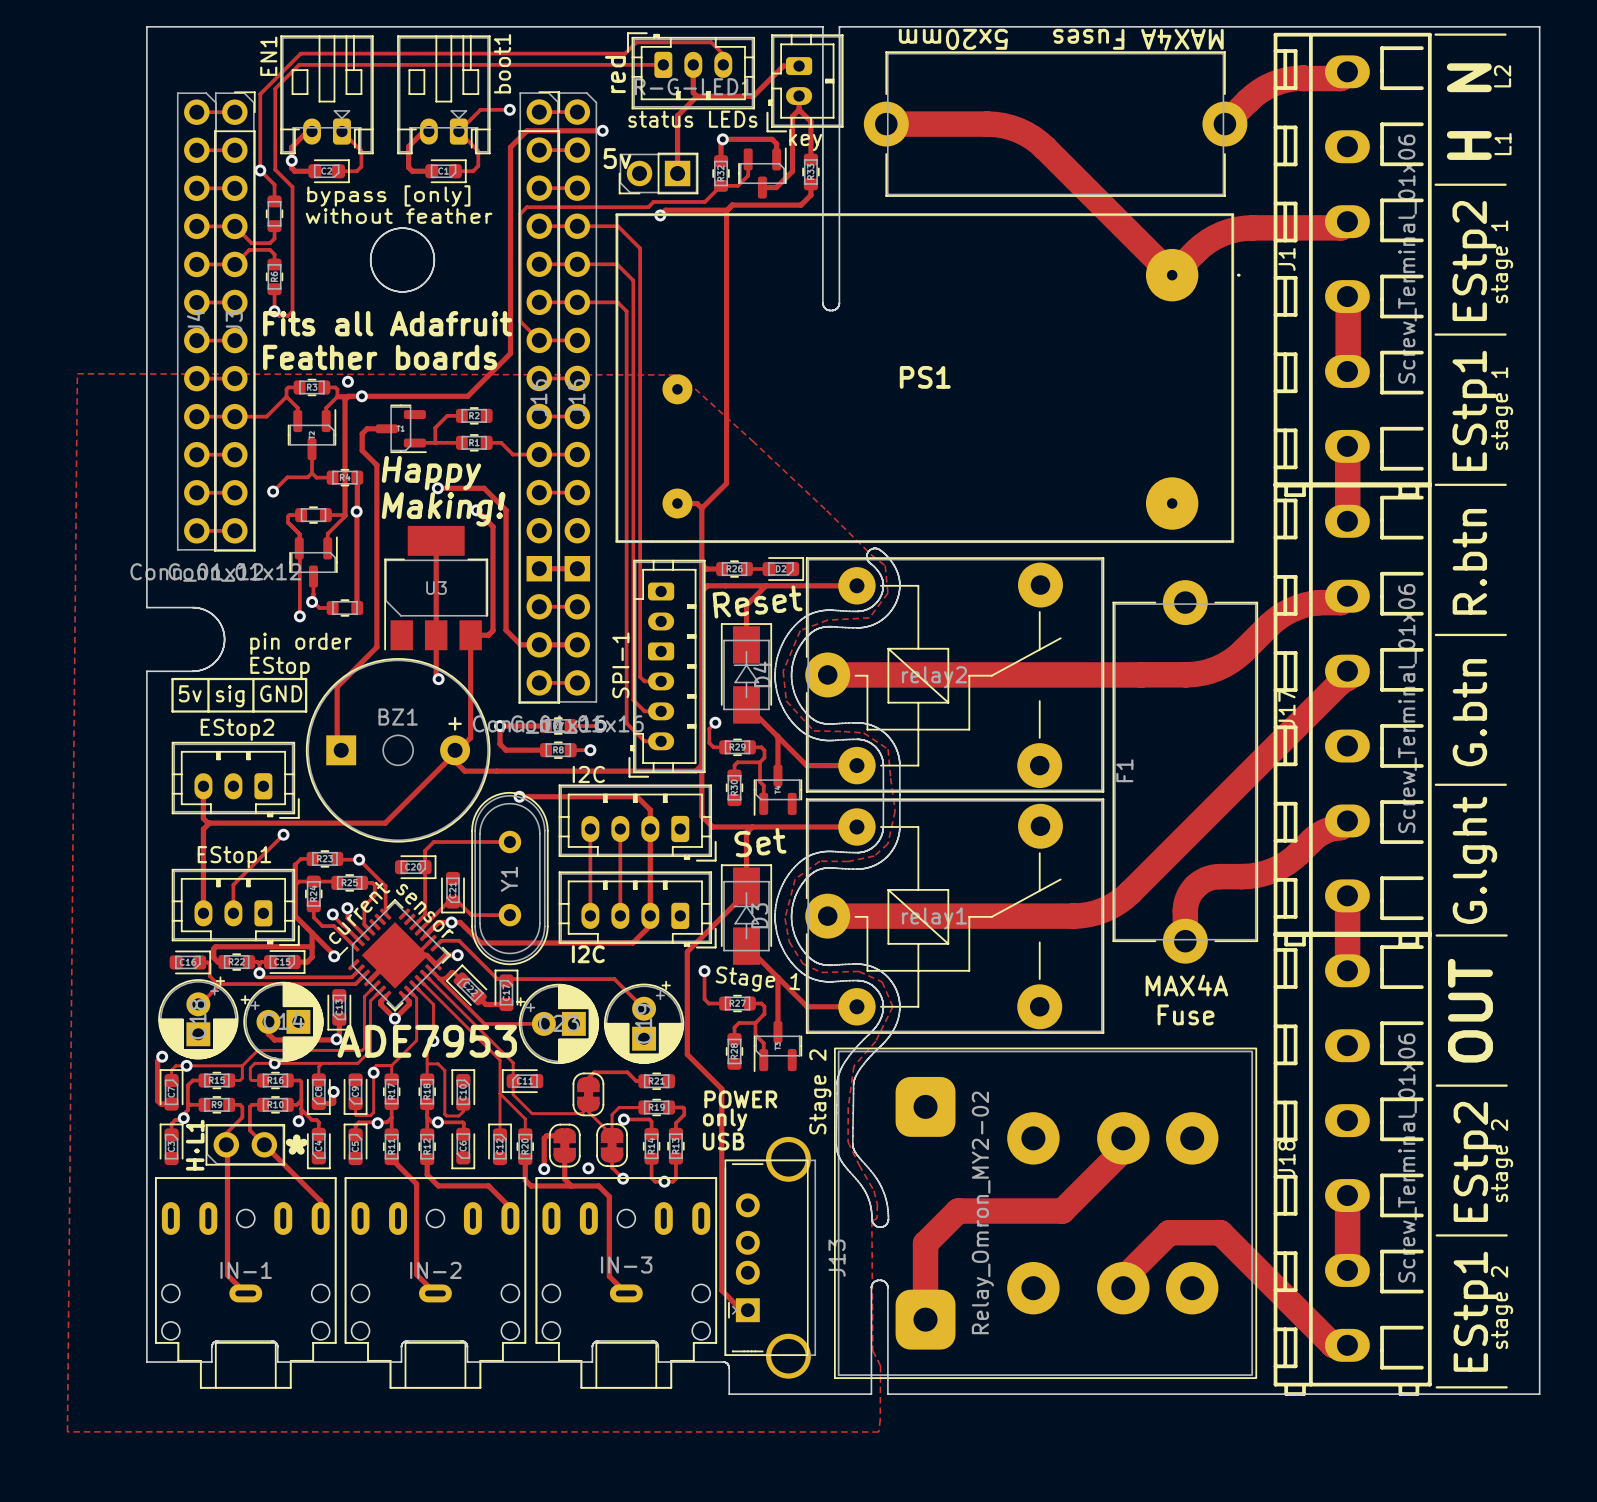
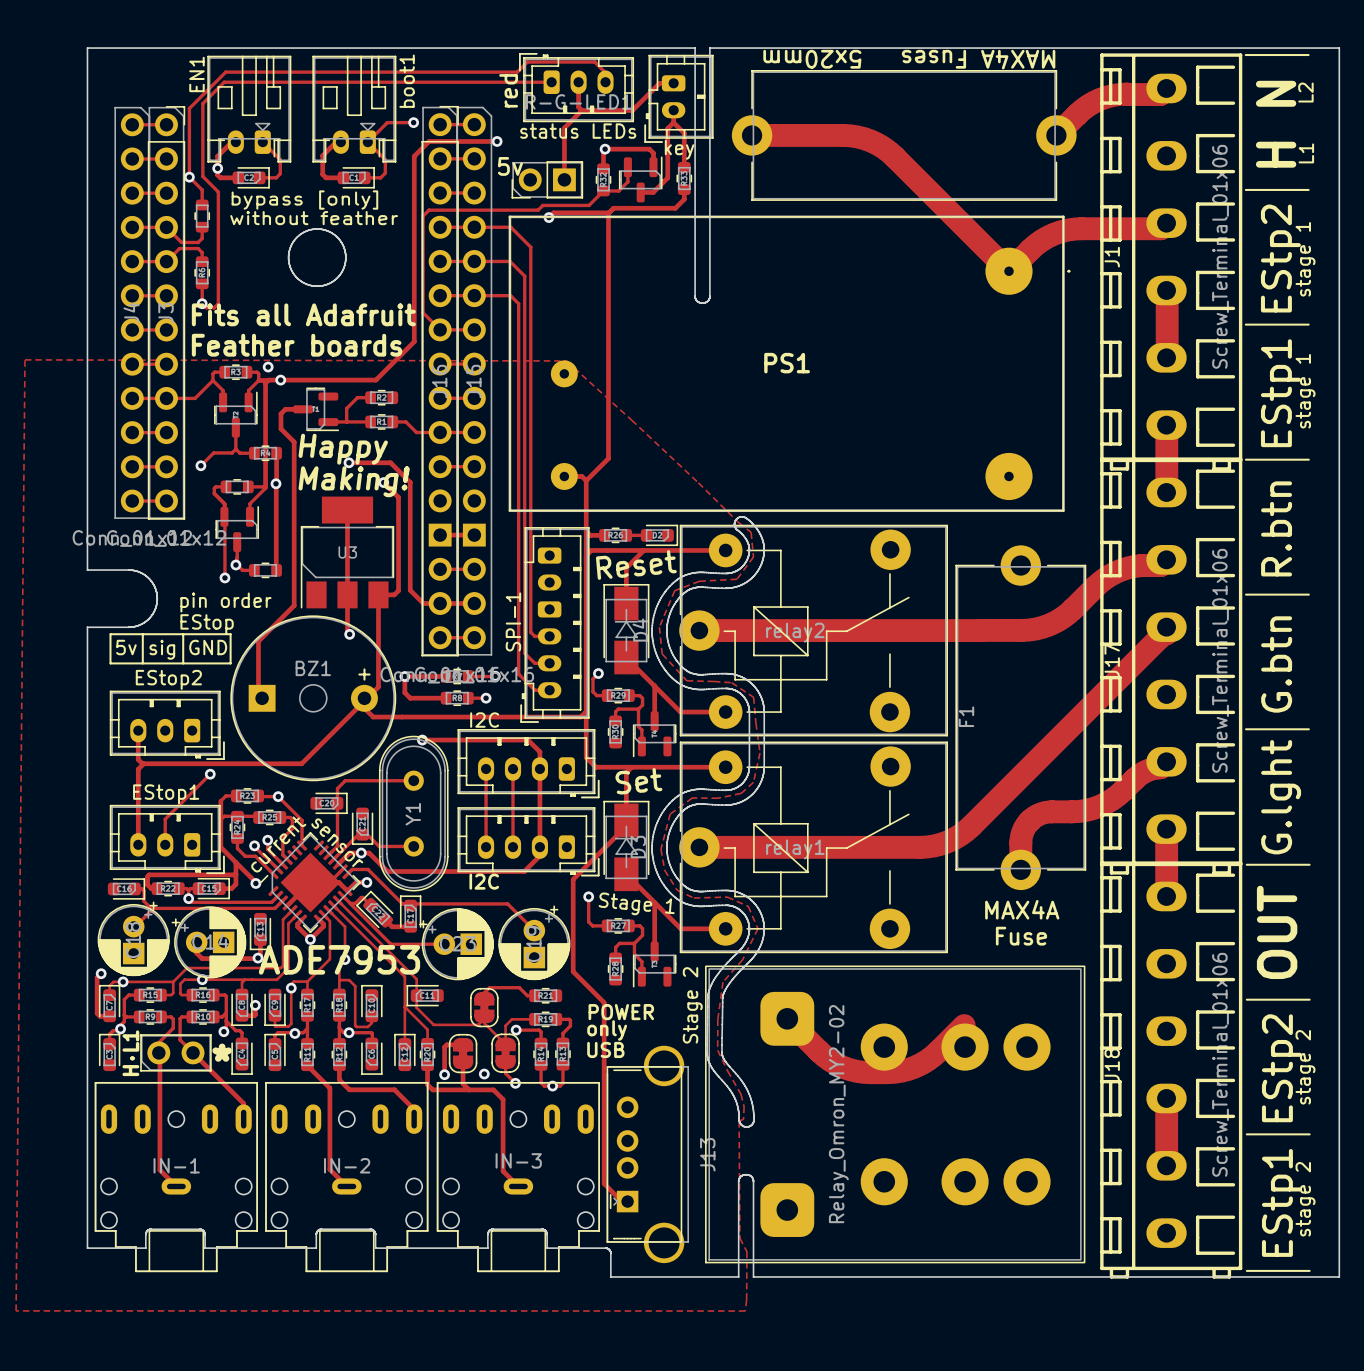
track: none -> (793, 1025) (830, 1060) (849, 1069) (870, 1072) (901, 1071) (921, 1064) (933, 1056) (964, 1025)
track: (1123, 1138) (1123, 1150) (1062, 1211) (958, 1211) (925, 1243) (925, 1319) -> none
track: (1123, 1288) (1123, 1278) (1169, 1232) (1220, 1232) (1333, 1345) (1347, 1345) -> none

